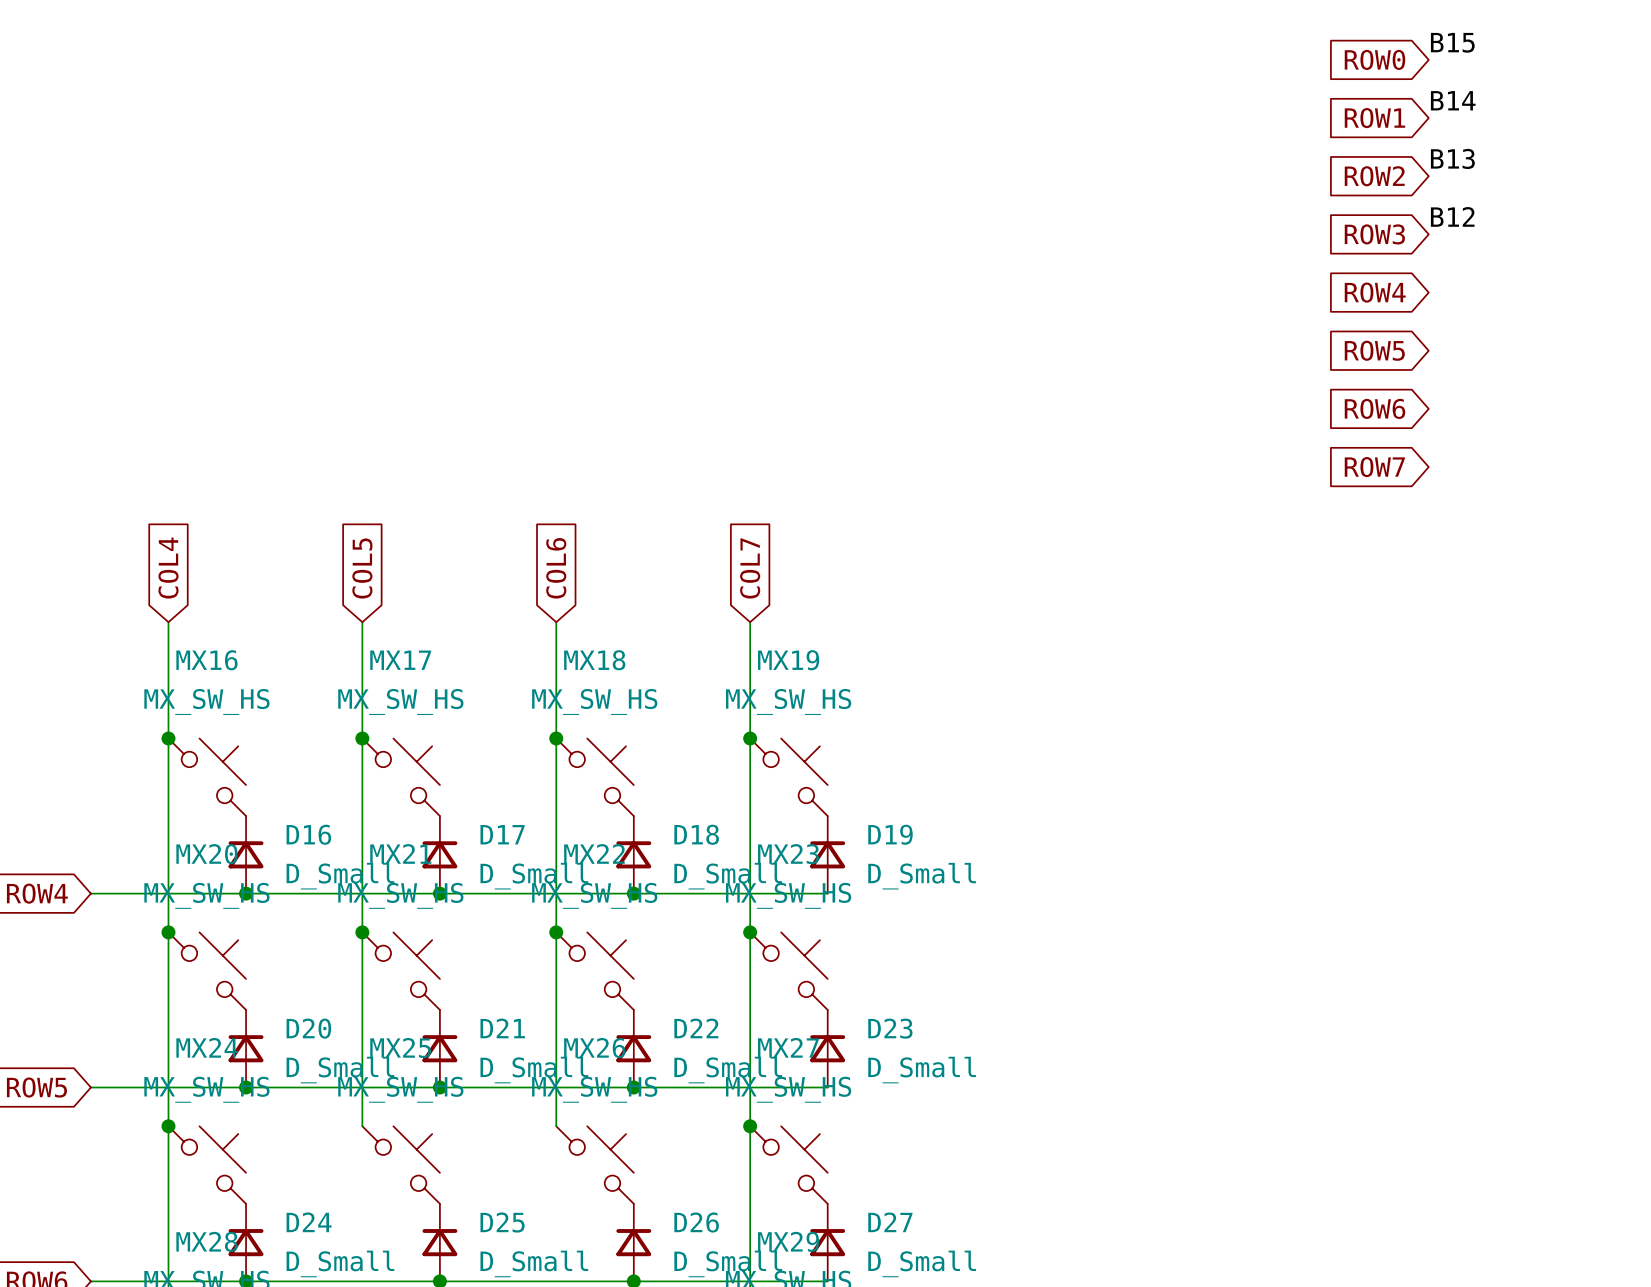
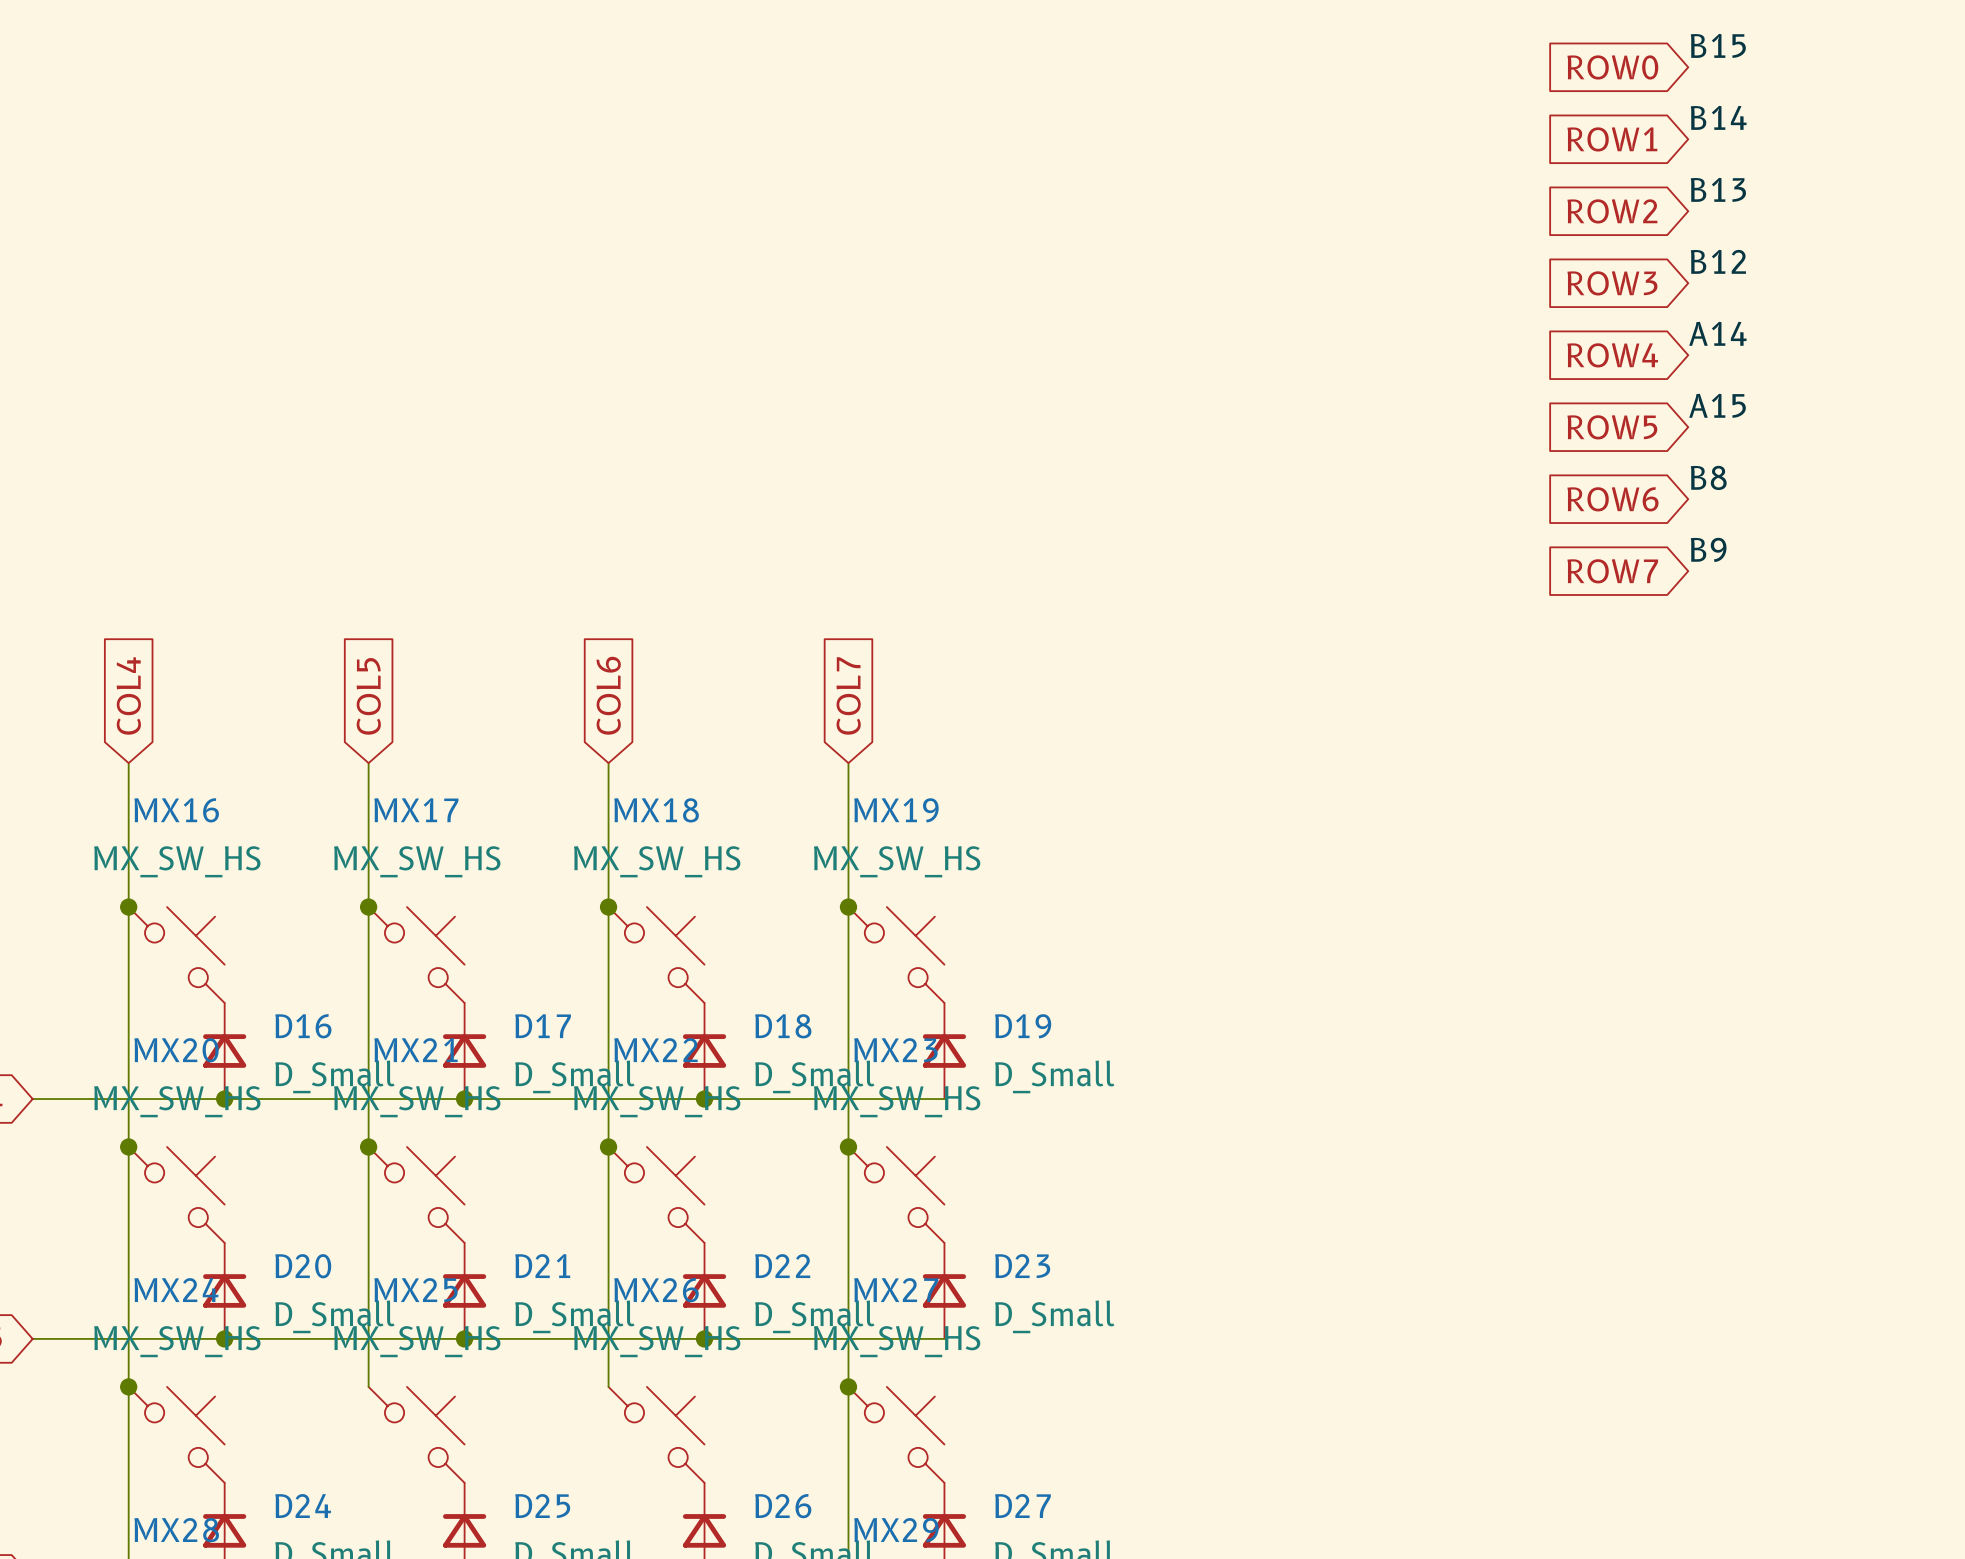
label: none -> A14 (1717, 333)
label: none -> A15 (1717, 405)
label: none -> B8 (1708, 477)
label: none -> B9 (1708, 549)

